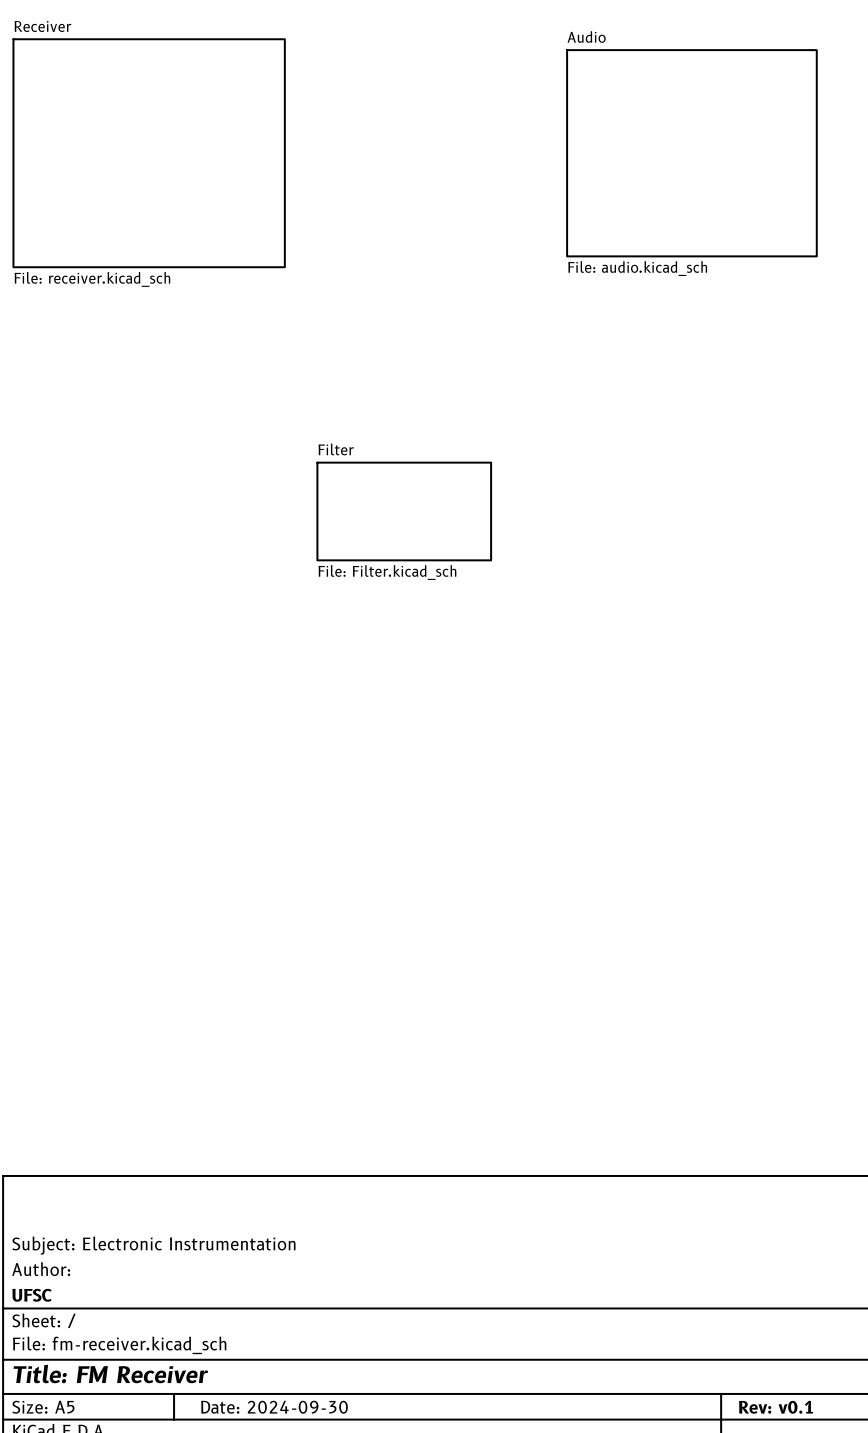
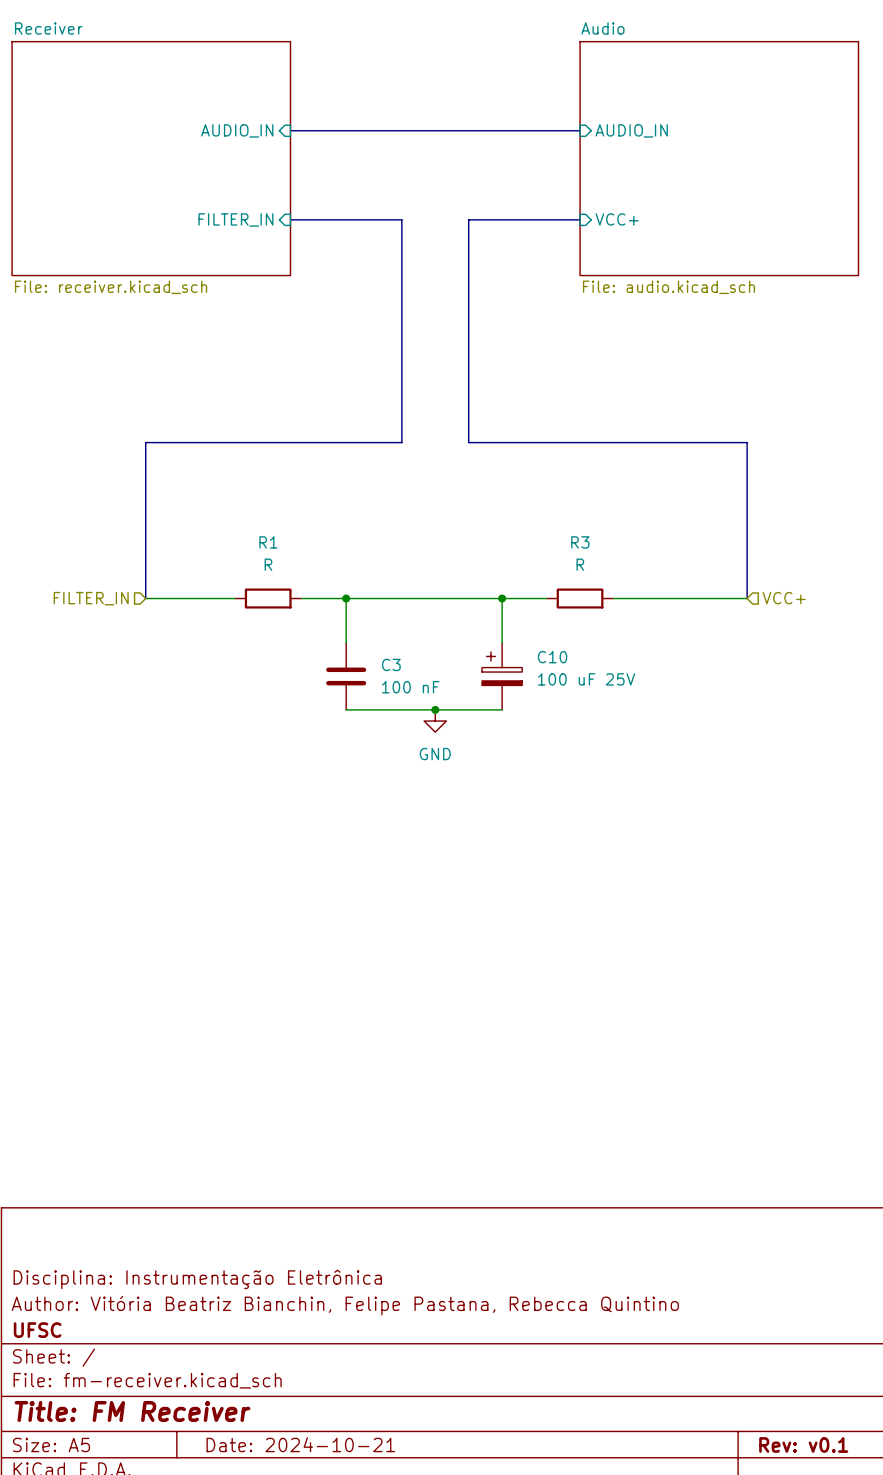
bus: none -> (290, 130) (580, 130)
sheet pin: none -> AUDIO_IN (237, 130)
sheet pin: none -> AUDIO_IN (631, 130)
sheet Audio: File: audio.kicad_sch (691, 153) -> none
sheet Audio: none -> File: audio.kicad_sch (719, 158)
bus: none -> (290, 219) (401, 219) (401, 442) (145, 442) (145, 598)
bus: none -> (580, 219) (468, 219) (468, 442) (747, 442) (747, 598)
sheet pin: none -> VCC+ (617, 219)
sheet pin: none -> FILTER_IN (235, 219)
sheet Filter: File: Filter.kicad_sch (404, 511) -> none
hierarchical label: none -> VCC+ (784, 598)
wire: none -> (145, 598) (234, 598)
R1: none -> R (268, 598)
wire: none -> (301, 598) (546, 598)
wire: none -> (346, 598) (346, 643)
junction: none -> (346, 598)
wire: none -> (502, 598) (502, 643)
junction: none -> (502, 598)
R3: none -> R (580, 598)
wire: none -> (613, 598) (747, 598)
hierarchical label: none -> FILTER_IN (91, 598)
C3: none -> 100 nF (346, 676)
C10: none -> 100 uF 25V (502, 676)
wire: none -> (346, 709) (502, 709)
junction: none -> (435, 709)
power symbol: none -> GND (435, 721)
title block: Subject: Electronic Instrumentation (153, 1245) -> Disciplina: Instrumentação Eletrônica (197, 1279)
title block: Author: (41, 1269) -> Author: Vitória Beatriz Bianchin, Felipe Pastana, Rebecca Quintino (345, 1305)
title block: Date: 2024-09-30 (274, 1407) -> Date: 2024-10-21 (300, 1444)

